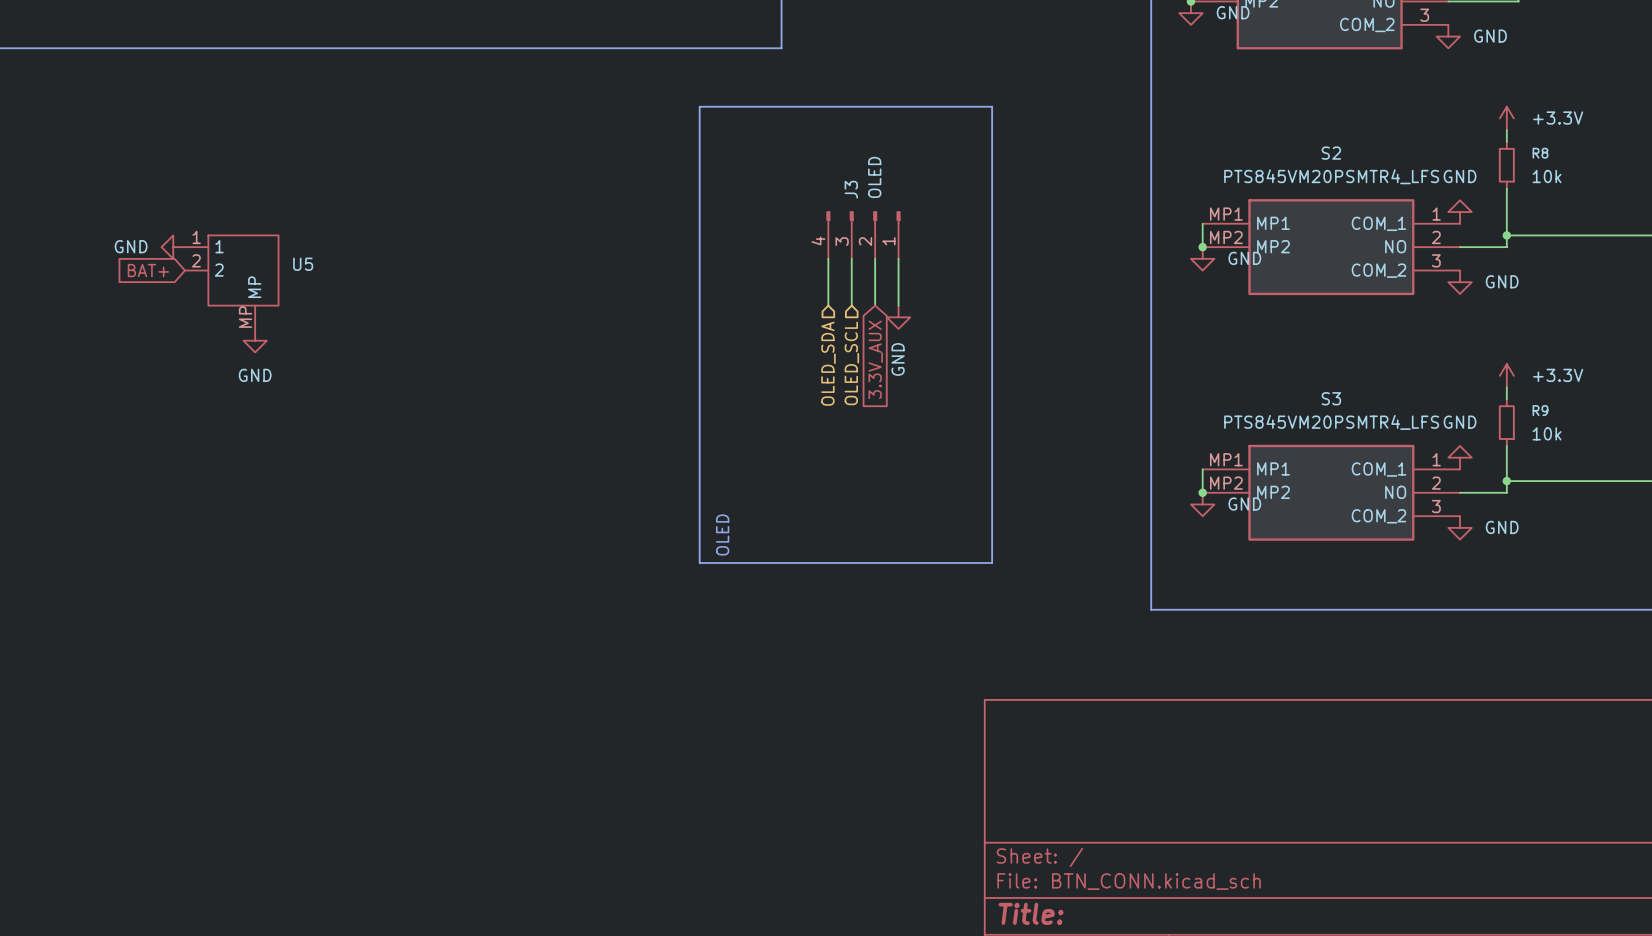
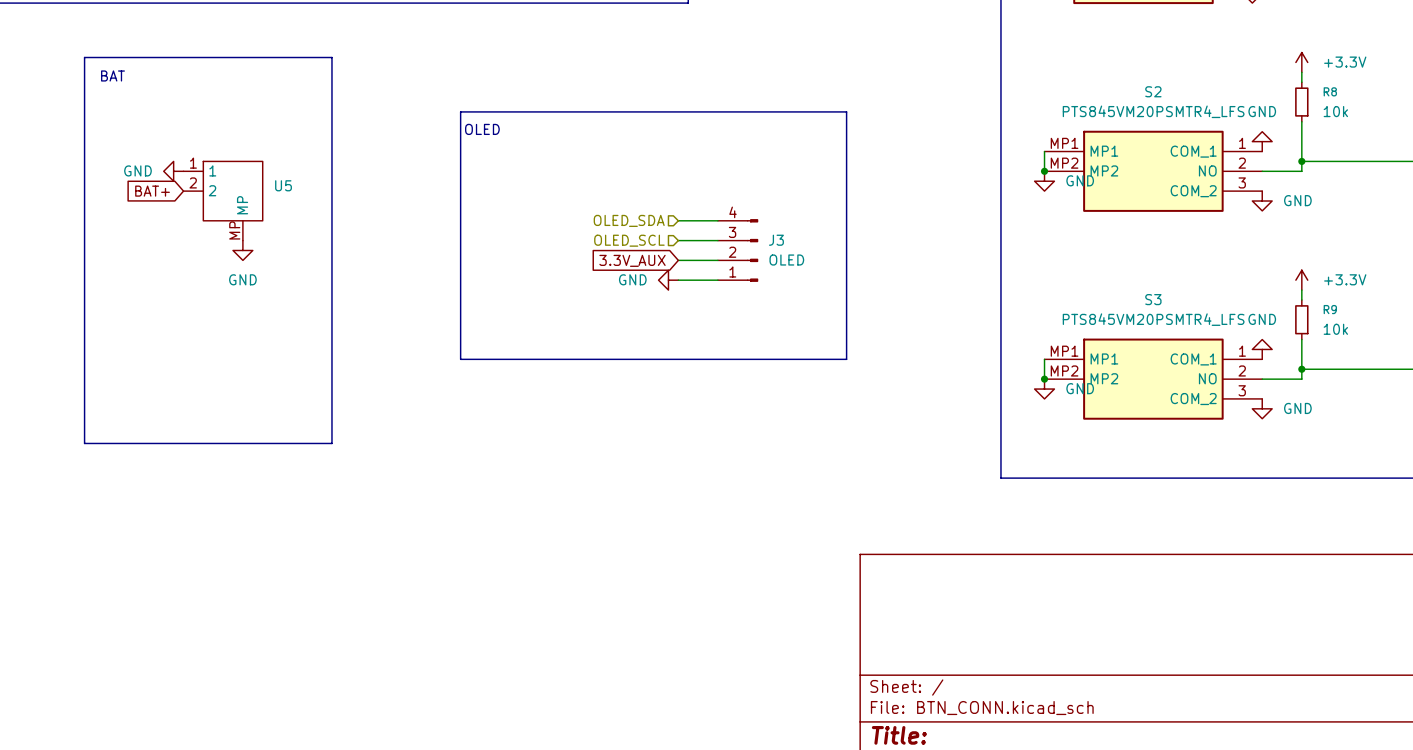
line: (699, 106) (992, 106) (992, 562) (699, 562) (699, 106) -> none
line: none -> (84, 57) (331, 57) (331, 443) (84, 443) (84, 57)
text: none -> BAT (112, 75)
line: none -> (460, 111) (846, 111) (846, 359) (460, 359) (460, 111)
text: none -> OLED (482, 129)
J3 rotation: 0° (863, 217) -> 90° clockwise (752, 250)
J3 position: (863, 235) -> (738, 250)
wire: (828, 258) (828, 305) -> none
wire: (851, 258) (851, 305) -> none
wire: (875, 258) (875, 305) -> none
wire: (898, 258) (898, 305) -> none
wire: none -> (678, 220) (717, 220)
power symbol rotation: 0° (898, 317) -> 90° clockwise (668, 280)
power symbol position: GND (898, 317) -> GND (668, 280)
wire: none -> (678, 240) (717, 240)
wire: none -> (678, 260) (717, 260)
global label rotation: 0° (875, 359) -> 90° clockwise (632, 260)
global label position: 3.3V_AUX (875, 359) -> 3.3V_AUX (632, 260)
hierarchical label rotation: 0° (828, 363) -> 90° clockwise (629, 220)
hierarchical label position: OLED_SDA (828, 363) -> OLED_SDA (629, 220)
hierarchical label rotation: 0° (851, 363) -> 90° clockwise (629, 240)
hierarchical label position: OLED_SCL (851, 363) -> OLED_SCL (629, 240)
wire: none -> (678, 280) (717, 280)
text: OLED (722, 534) -> none

